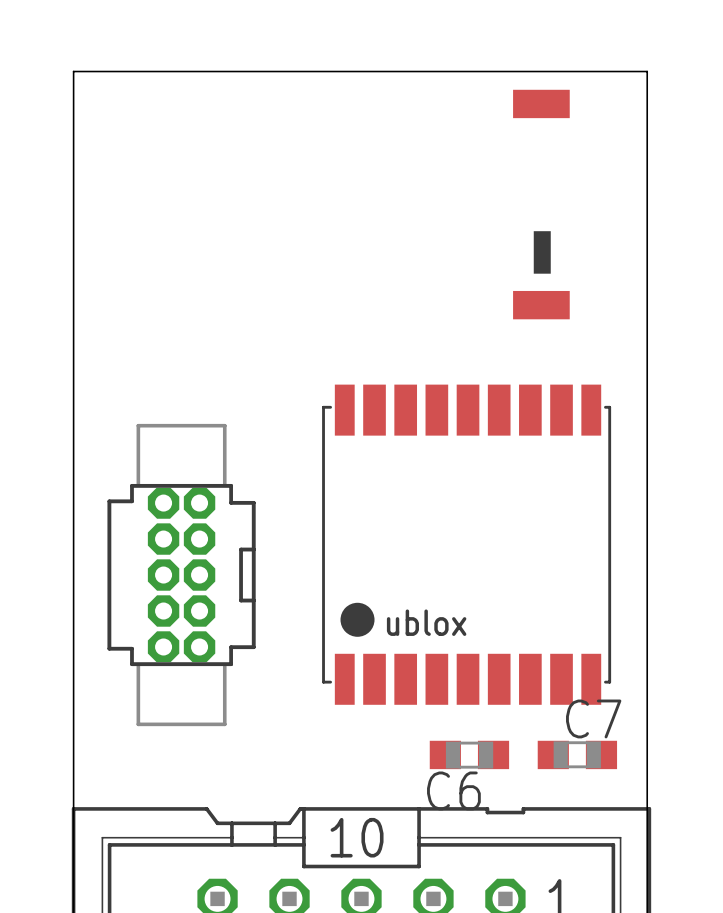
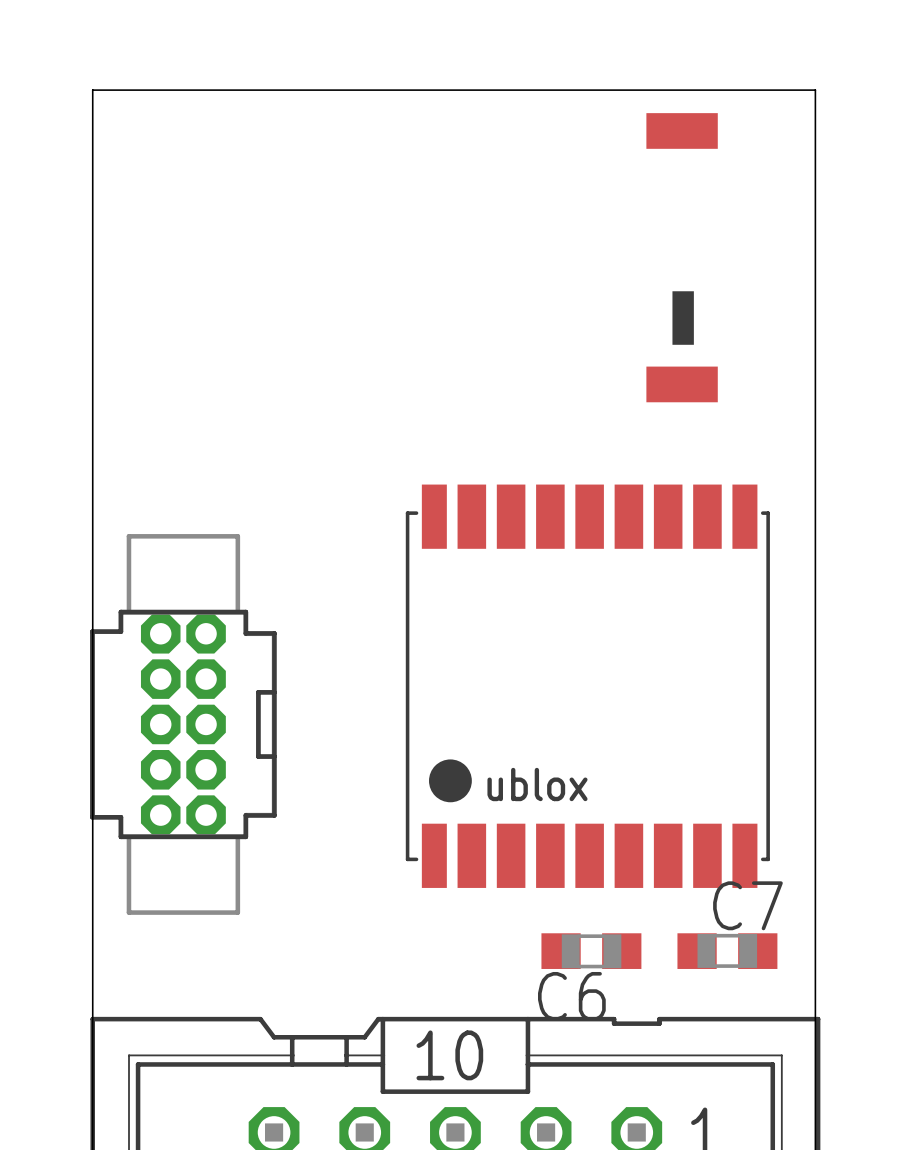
part position: (181, 575) -> (183, 724)

